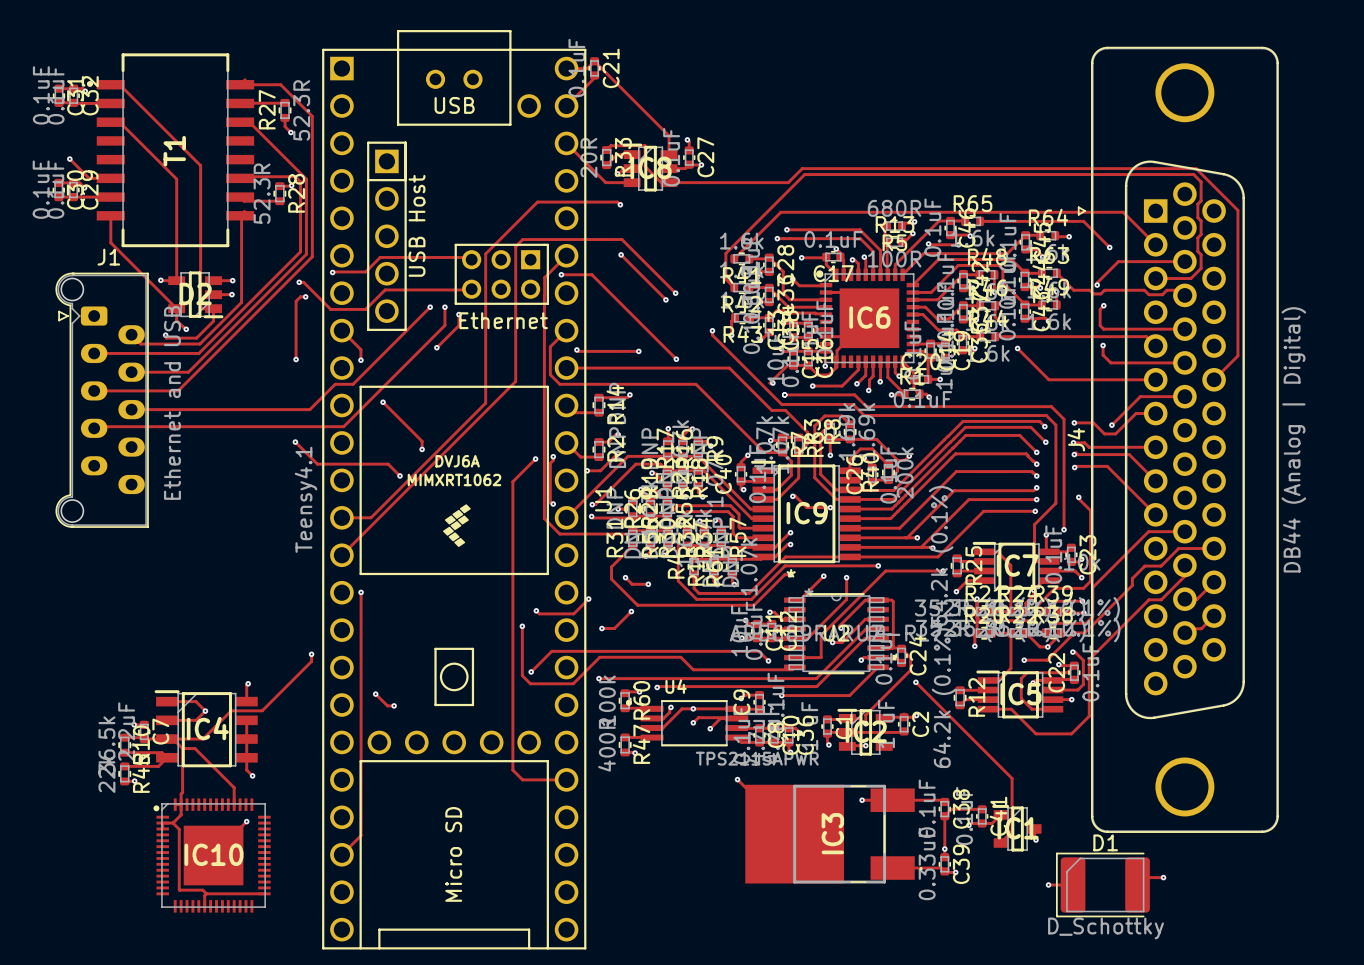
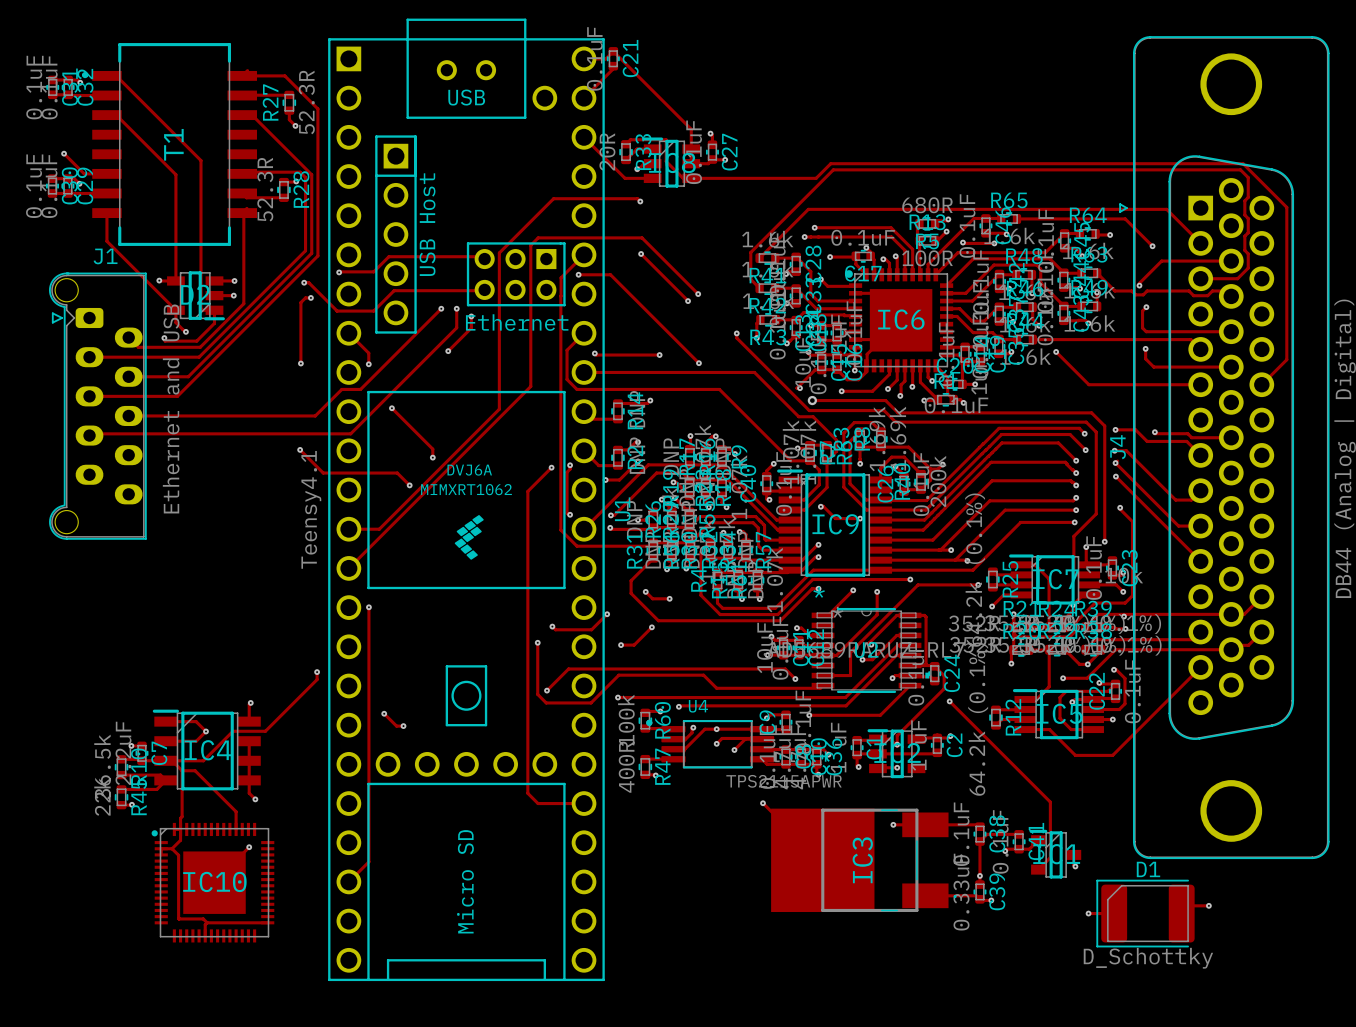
via: none -> (812, 400)
track: (1184, 396) (1140, 396) (1111, 425) -> none
track: (1155, 413) (1136, 413) (1115, 433) -> none
track: none -> (1154, 433) (1187, 433) (1191, 437) (1231, 437)
track: (1089, 447) (1155, 447) -> (1158, 441) (1186, 441) (1200, 455)
track: (1074, 454) (1129, 454) (1155, 481) -> (1131, 455) (1175, 500) (1191, 500) (1200, 490)
track: (1074, 467) (1107, 466) (1155, 514) -> (1115, 463) (1178, 526) (1200, 526)
track: none -> (1115, 476) (1200, 561)
track: (1184, 531) (1148, 531) (1092, 587) (1092, 616) (1086, 623) -> (1193, 639) (1127, 639)
track: (1214, 548) (1178, 548) (1161, 566) (1144, 566) (1132, 578) (1132, 585) (1084, 632) -> (1231, 649) (1126, 649)
track: (1184, 565) (1184, 576) (1161, 599) (1148, 599) (1089, 659) (1089, 716) -> (1200, 667) (1131, 736)
track: (1055, 601) (1082, 601) -> (1096, 616) (1098, 614) (1231, 614)

